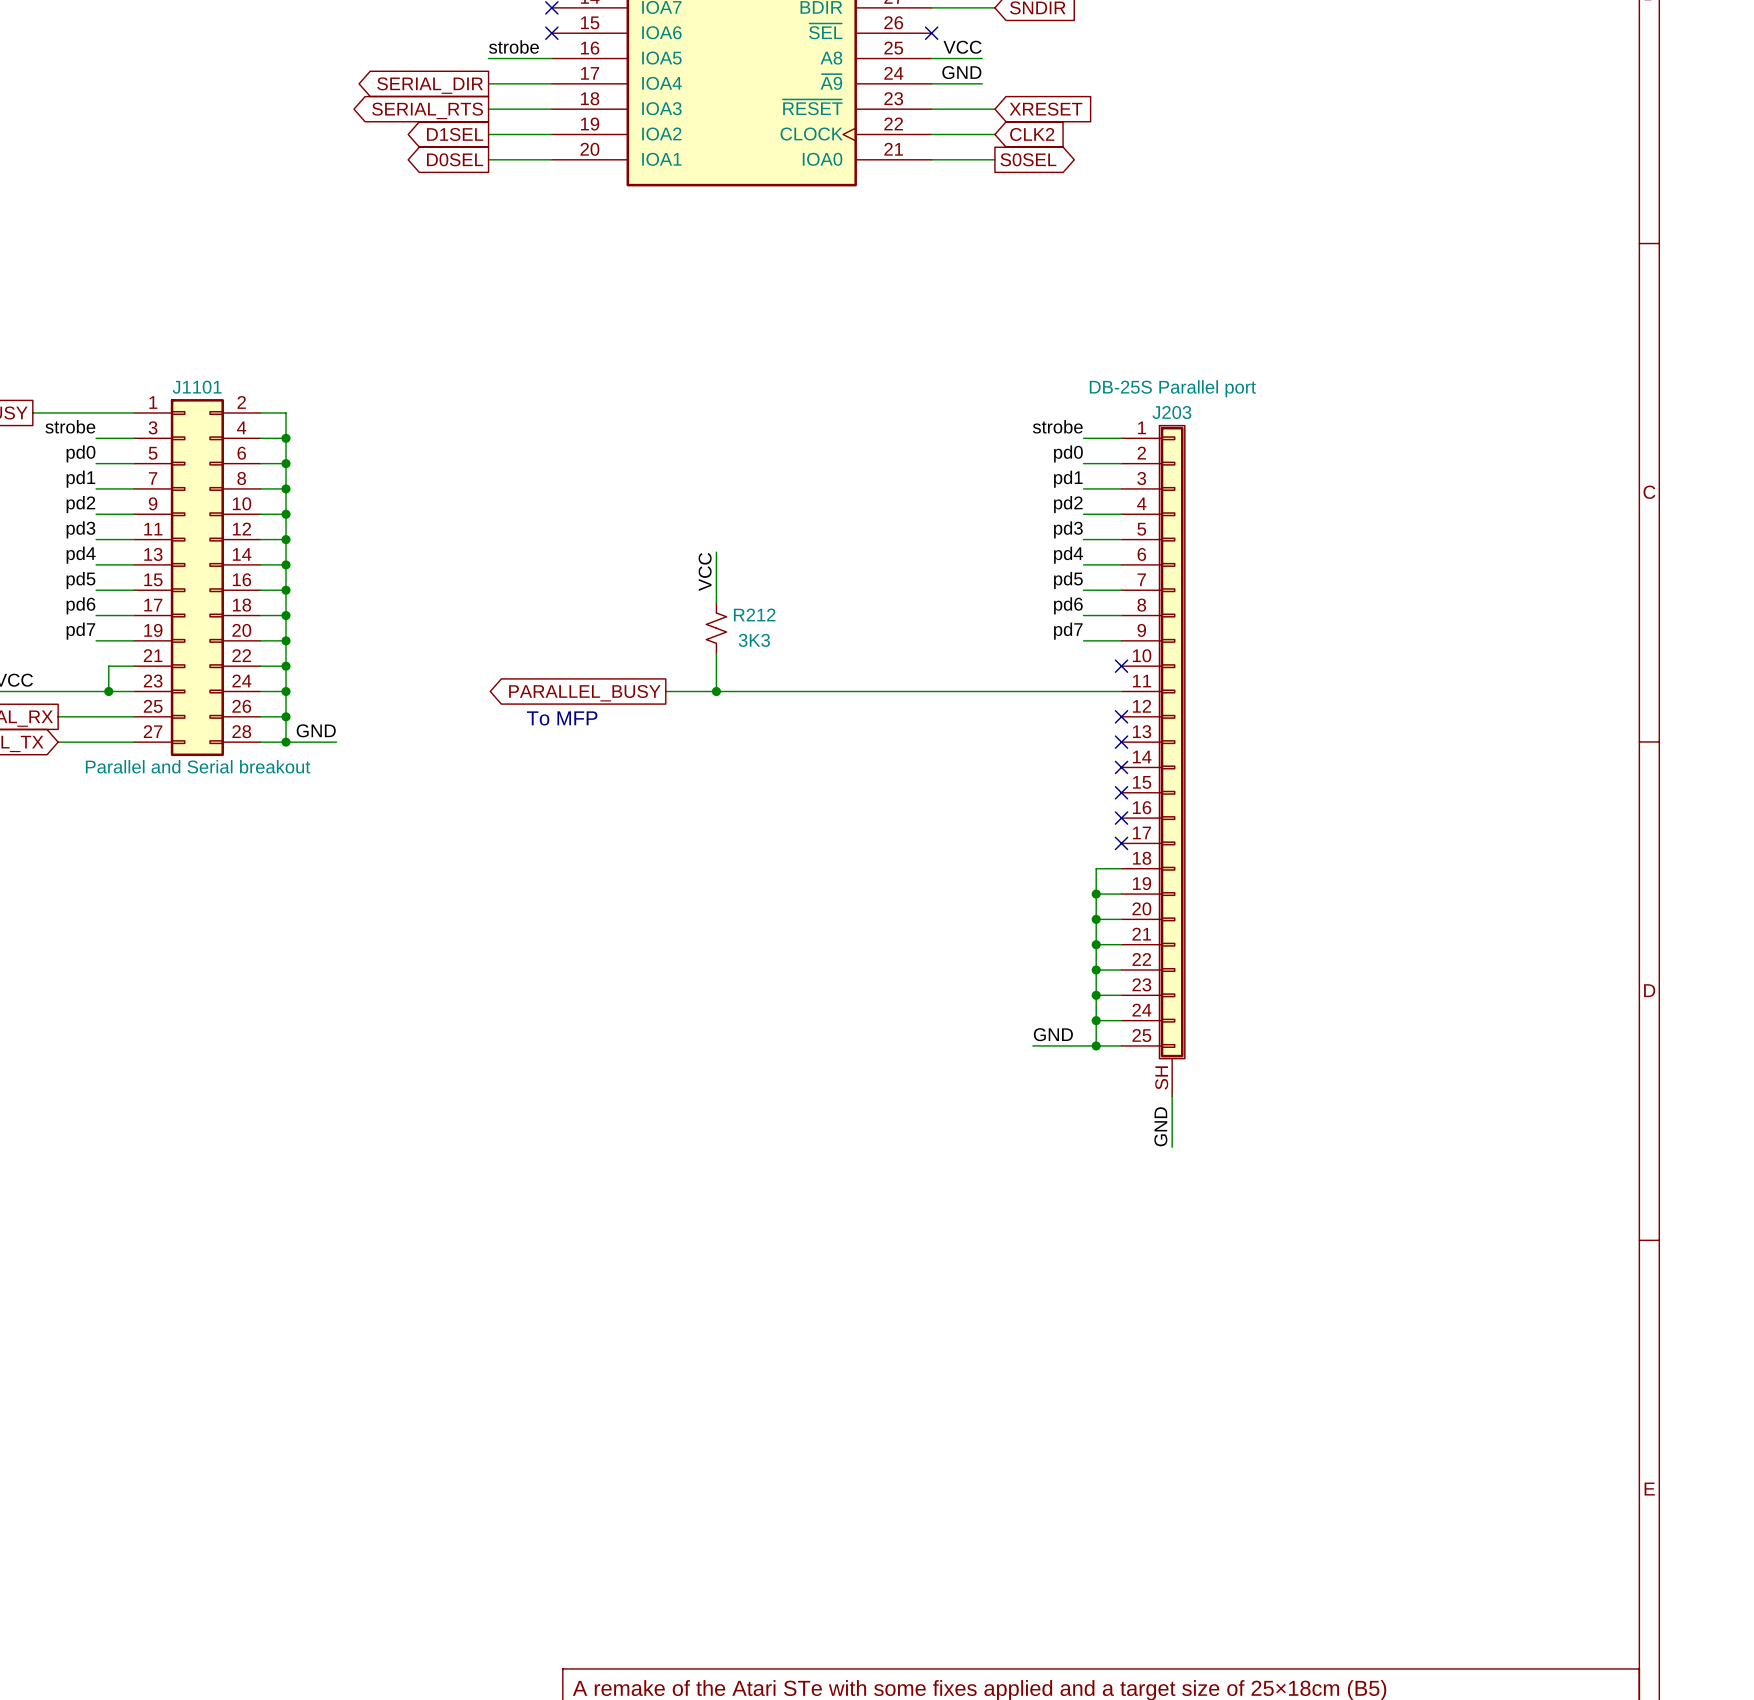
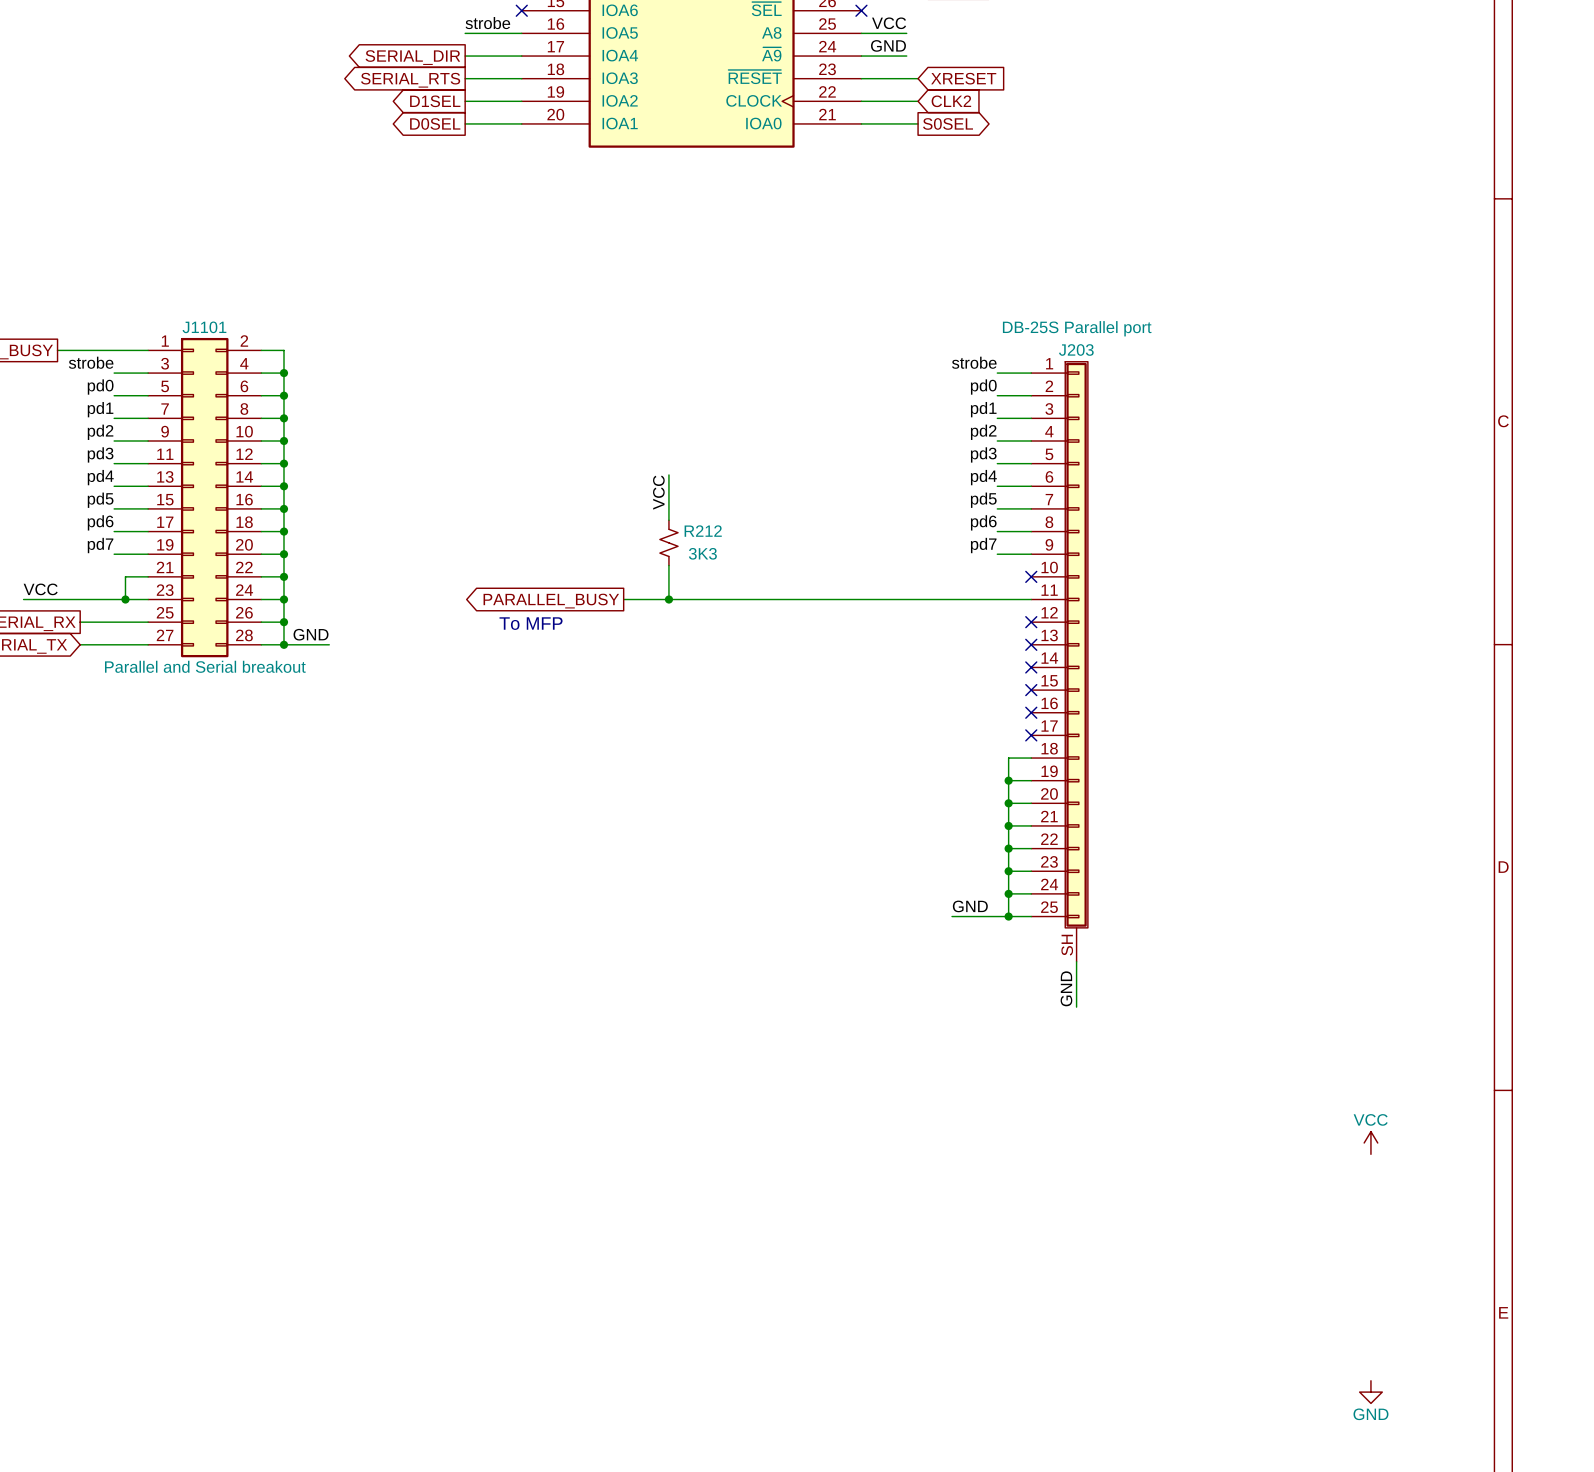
power symbol: none -> VCC (1370, 1142)
power symbol: none -> GND (1370, 1392)

